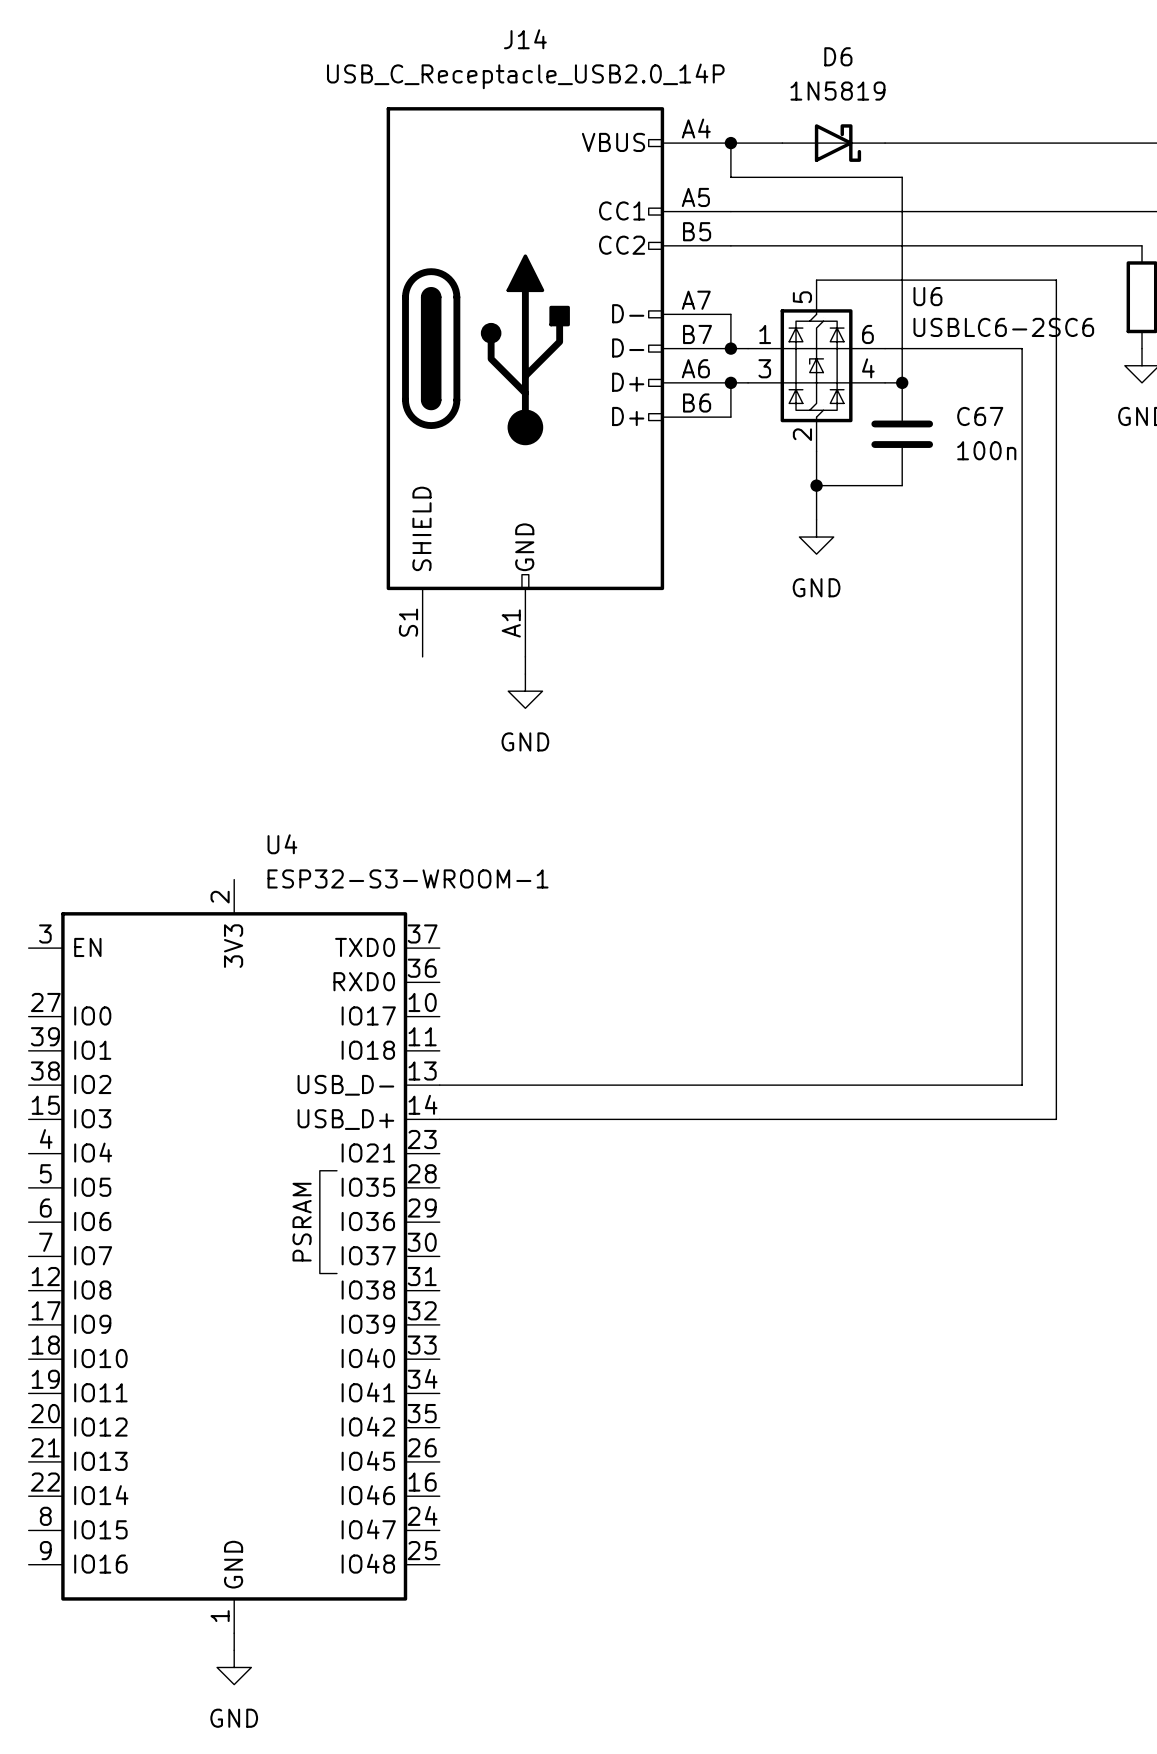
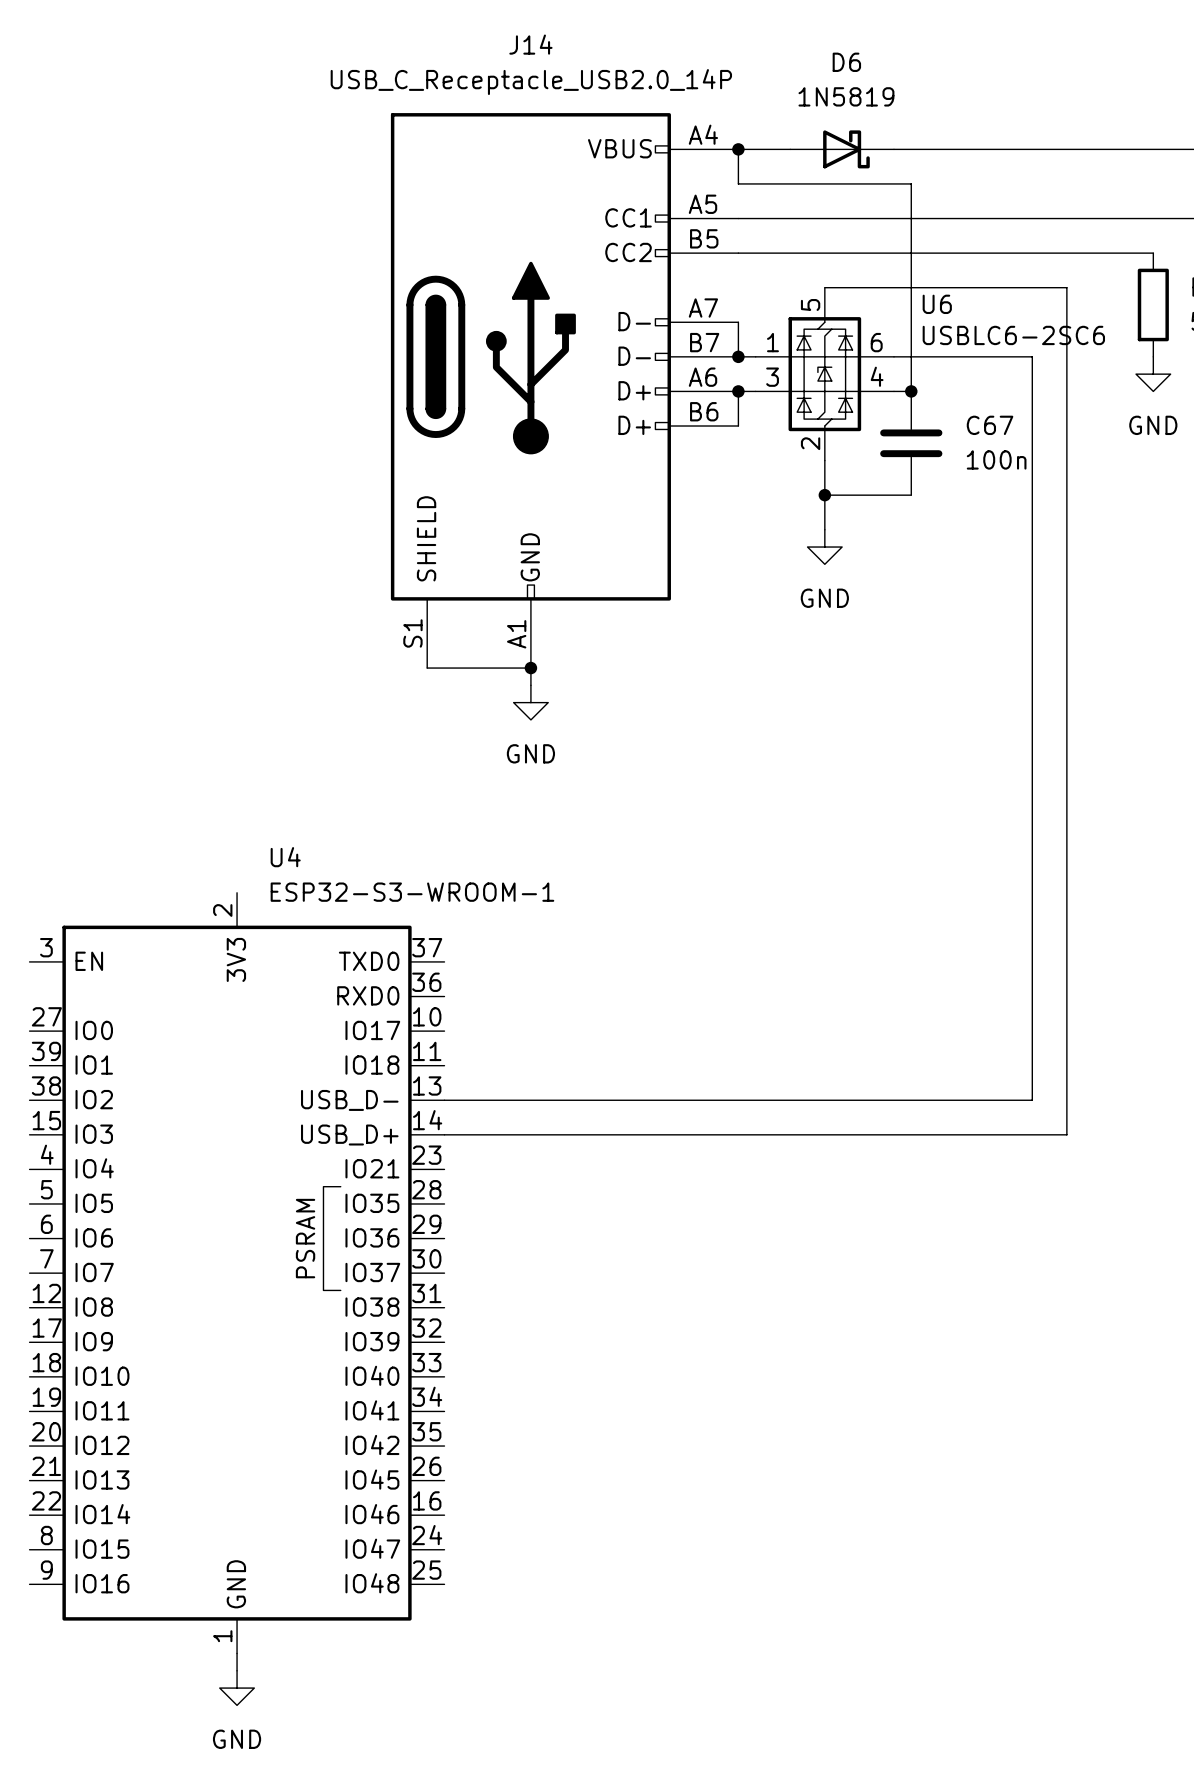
wire: none -> (427, 668) (530, 668)
junction: none -> (530, 668)

